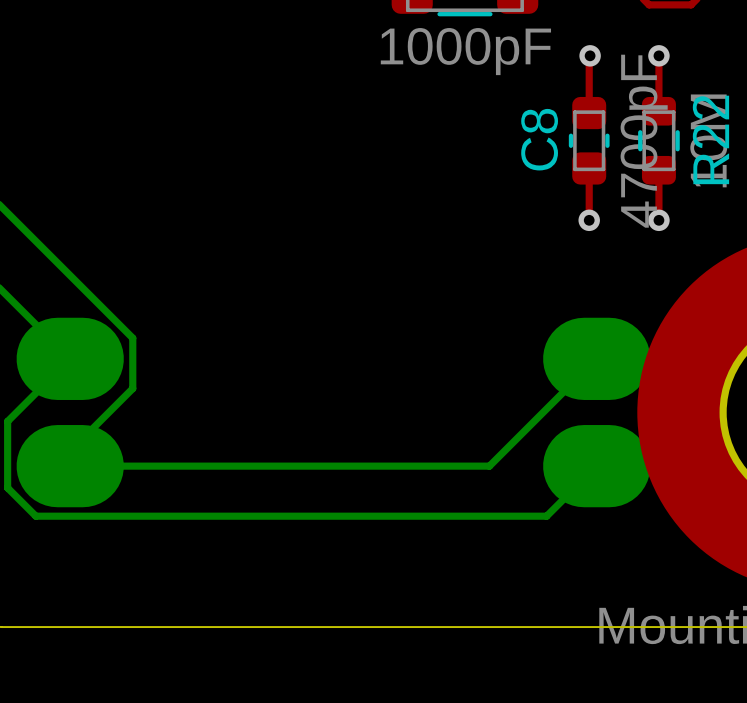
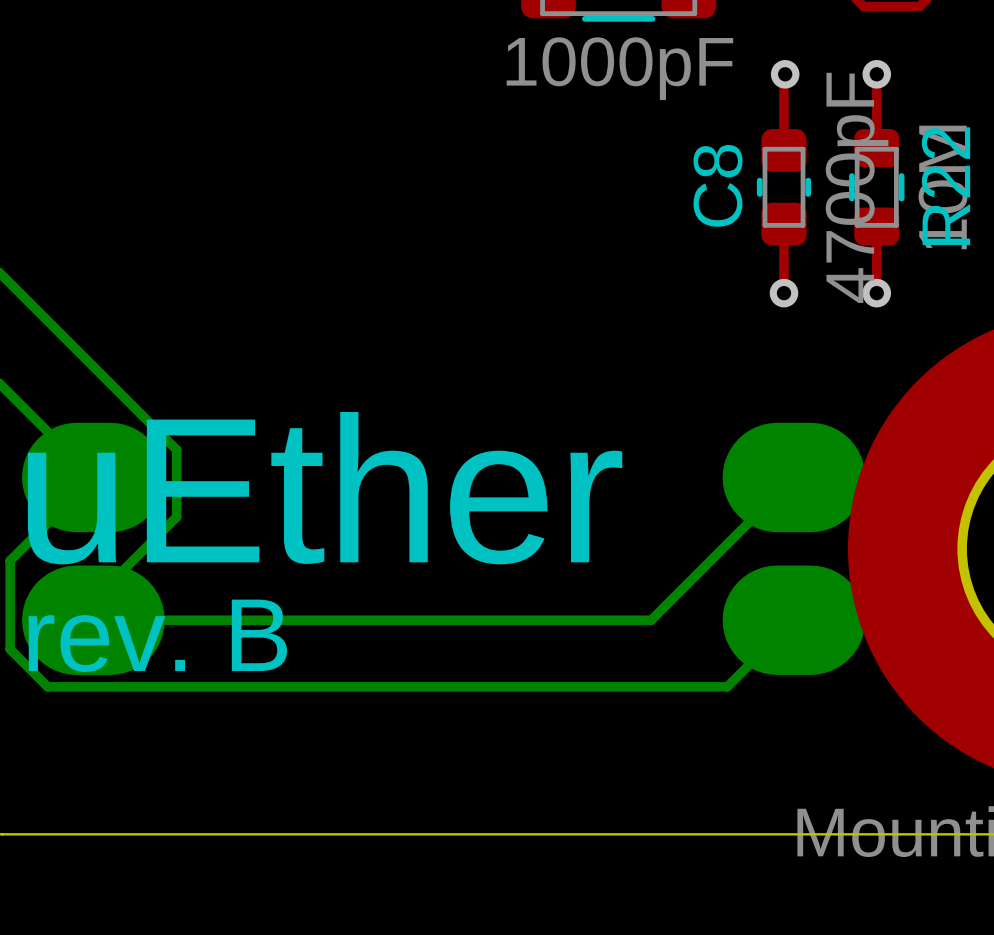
text: none -> uEther (325, 488)
text: none -> rev. B (157, 635)

